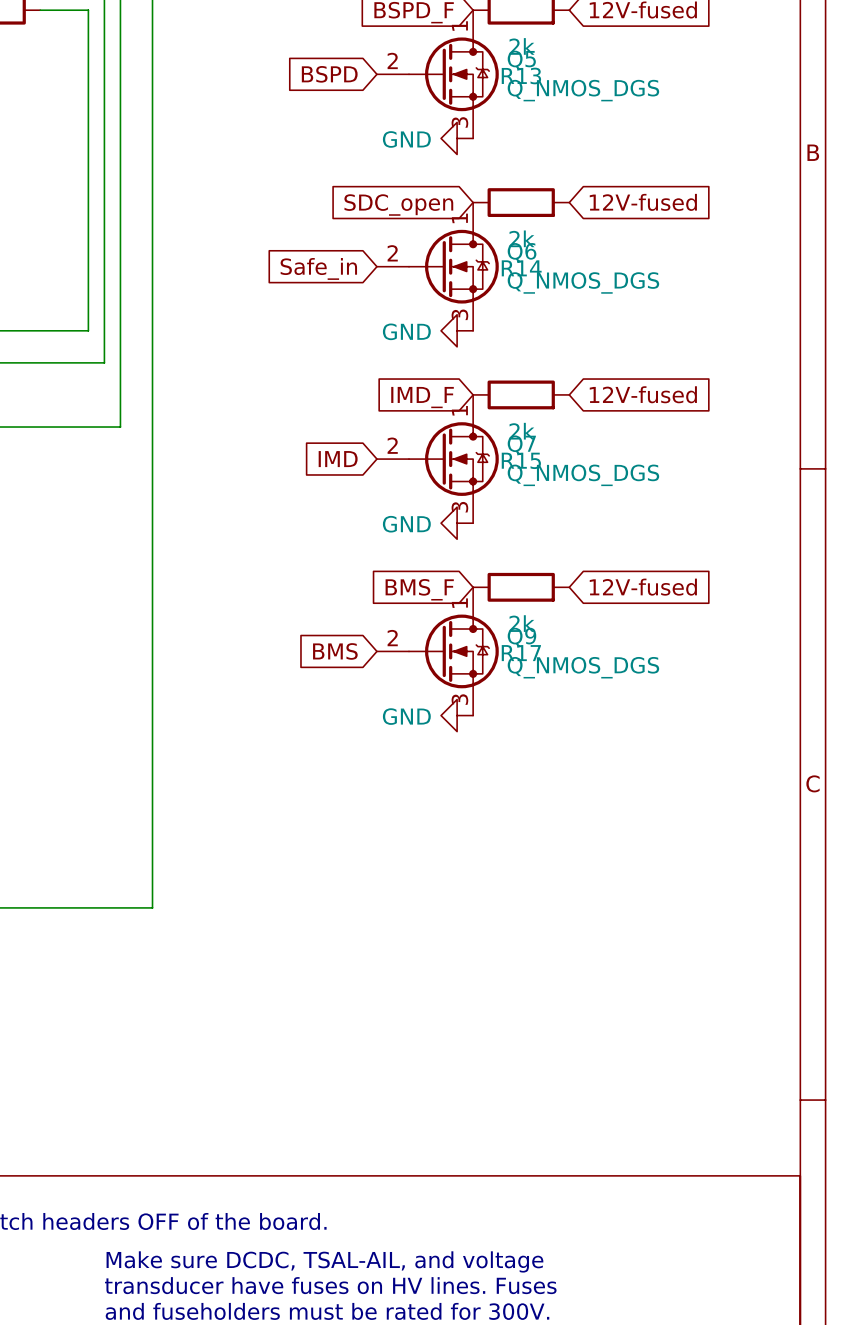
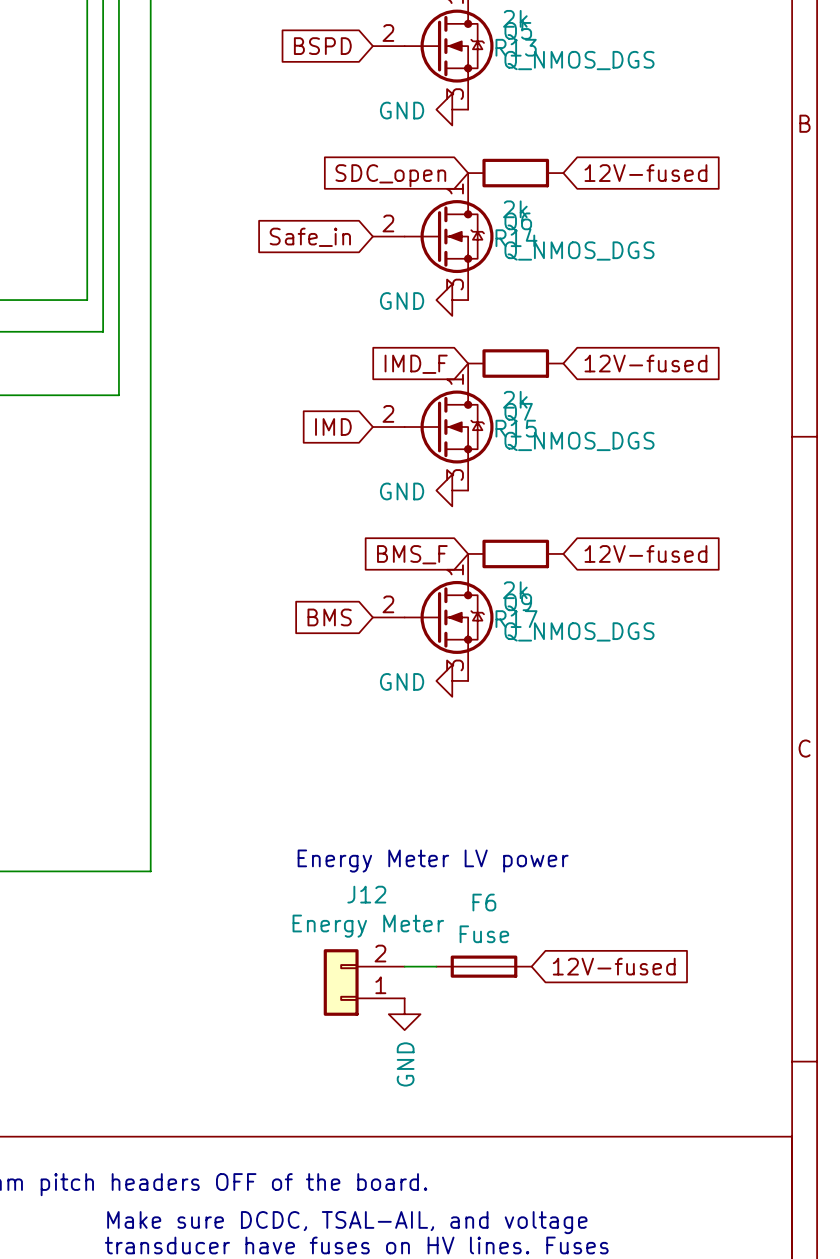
text: none -> Energy Meter LV power (433, 861)
global label: none -> 12V-fused (614, 966)
wire: none -> (404, 966) (436, 966)
F6: none -> Fuse (484, 966)
J12: none -> Energy Meter (364, 982)
power symbol: none -> GND (404, 1014)

